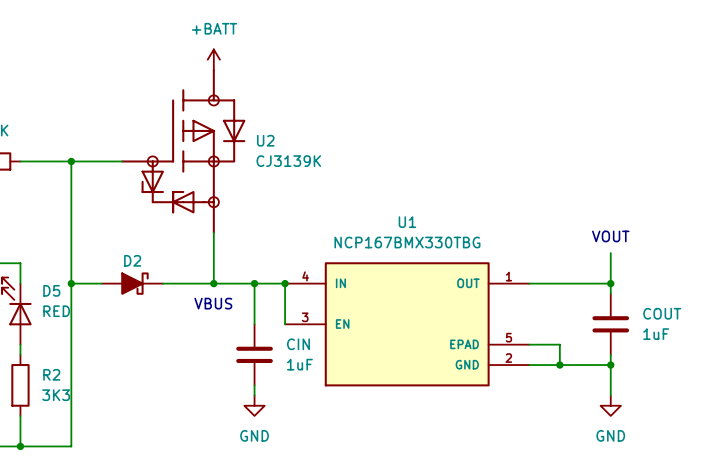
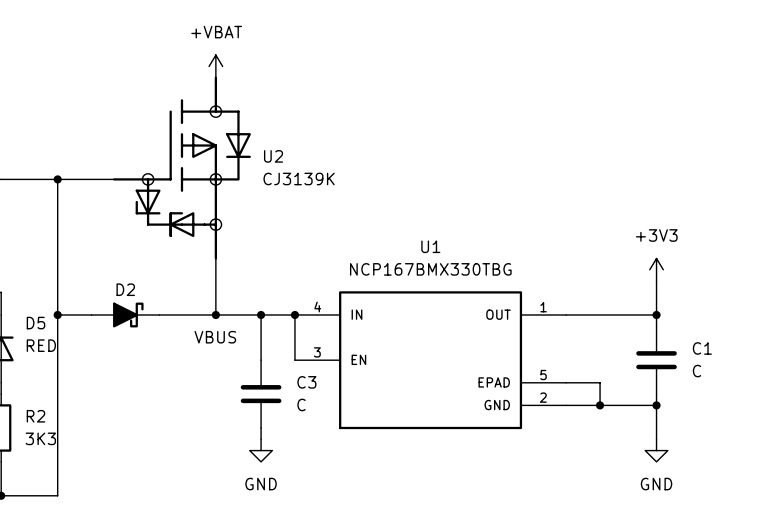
power symbol: +BATT (213, 59) -> +VBAT (215, 66)
text: VOUT (610, 236) -> none
power symbol: none -> +3V3 (656, 269)
COUT name: COUT (662, 313) -> C1 (702, 348)
COUT value: 1uF (656, 334) -> C (696, 371)
CIN name: CIN (298, 344) -> C3 (306, 382)
CIN value: 1uF (299, 364) -> C (301, 404)

